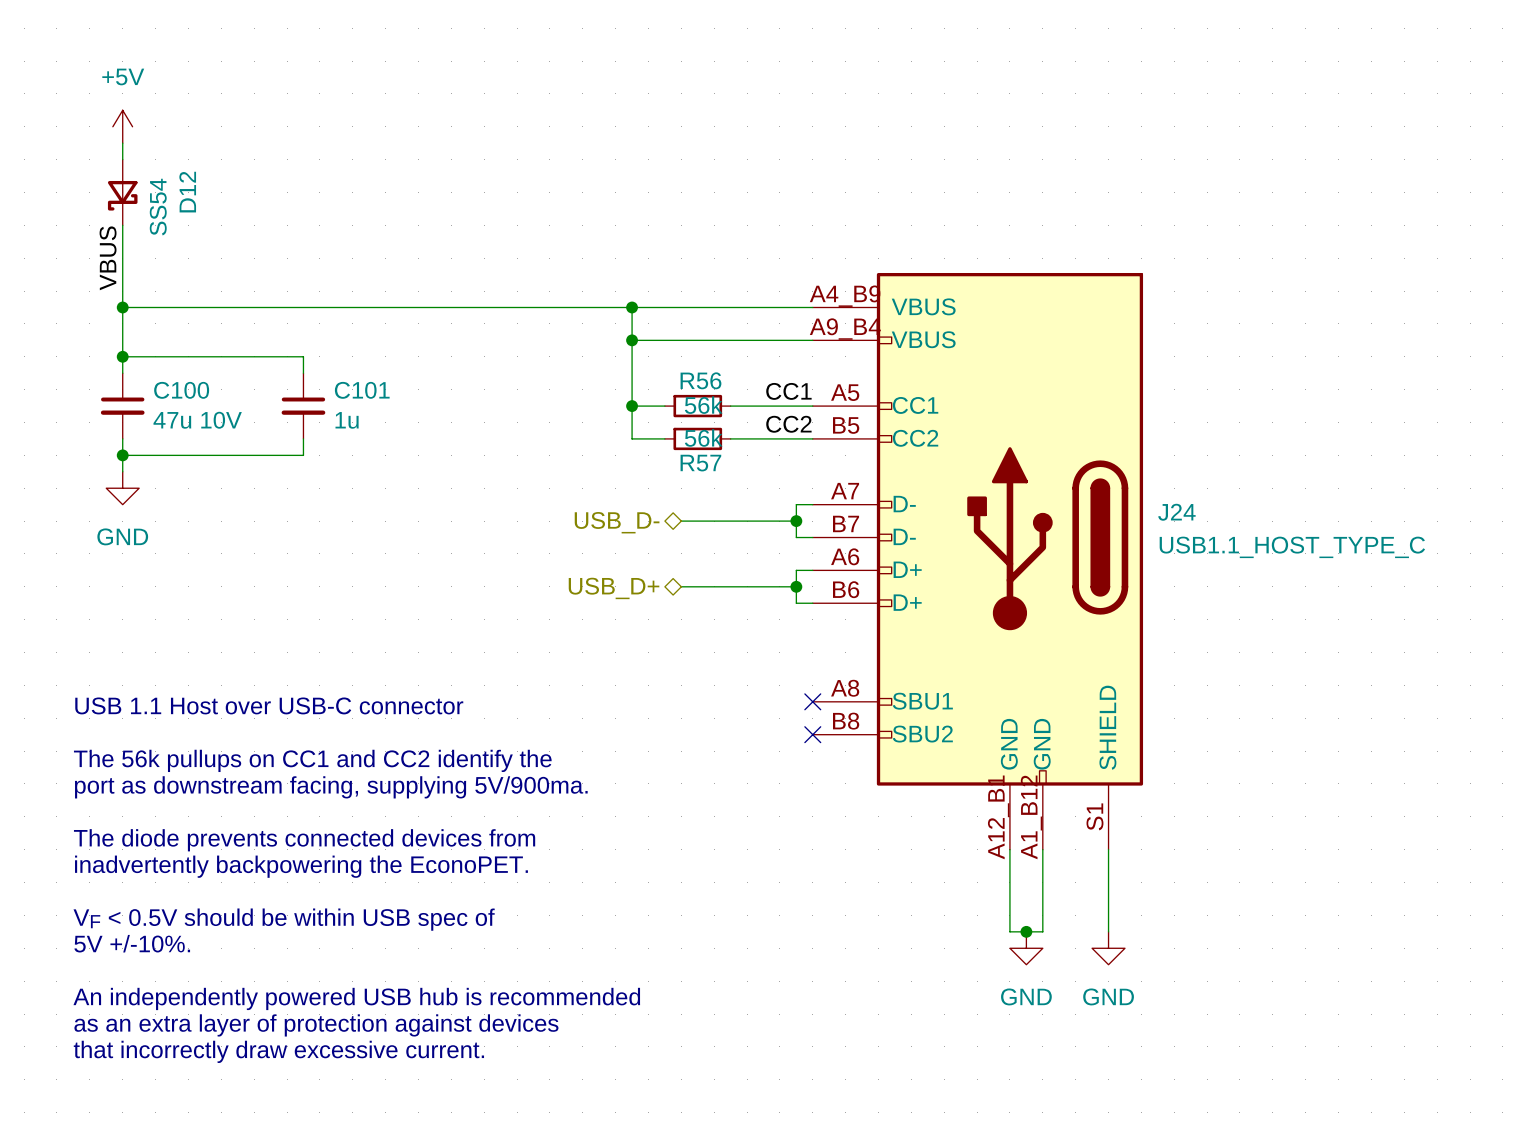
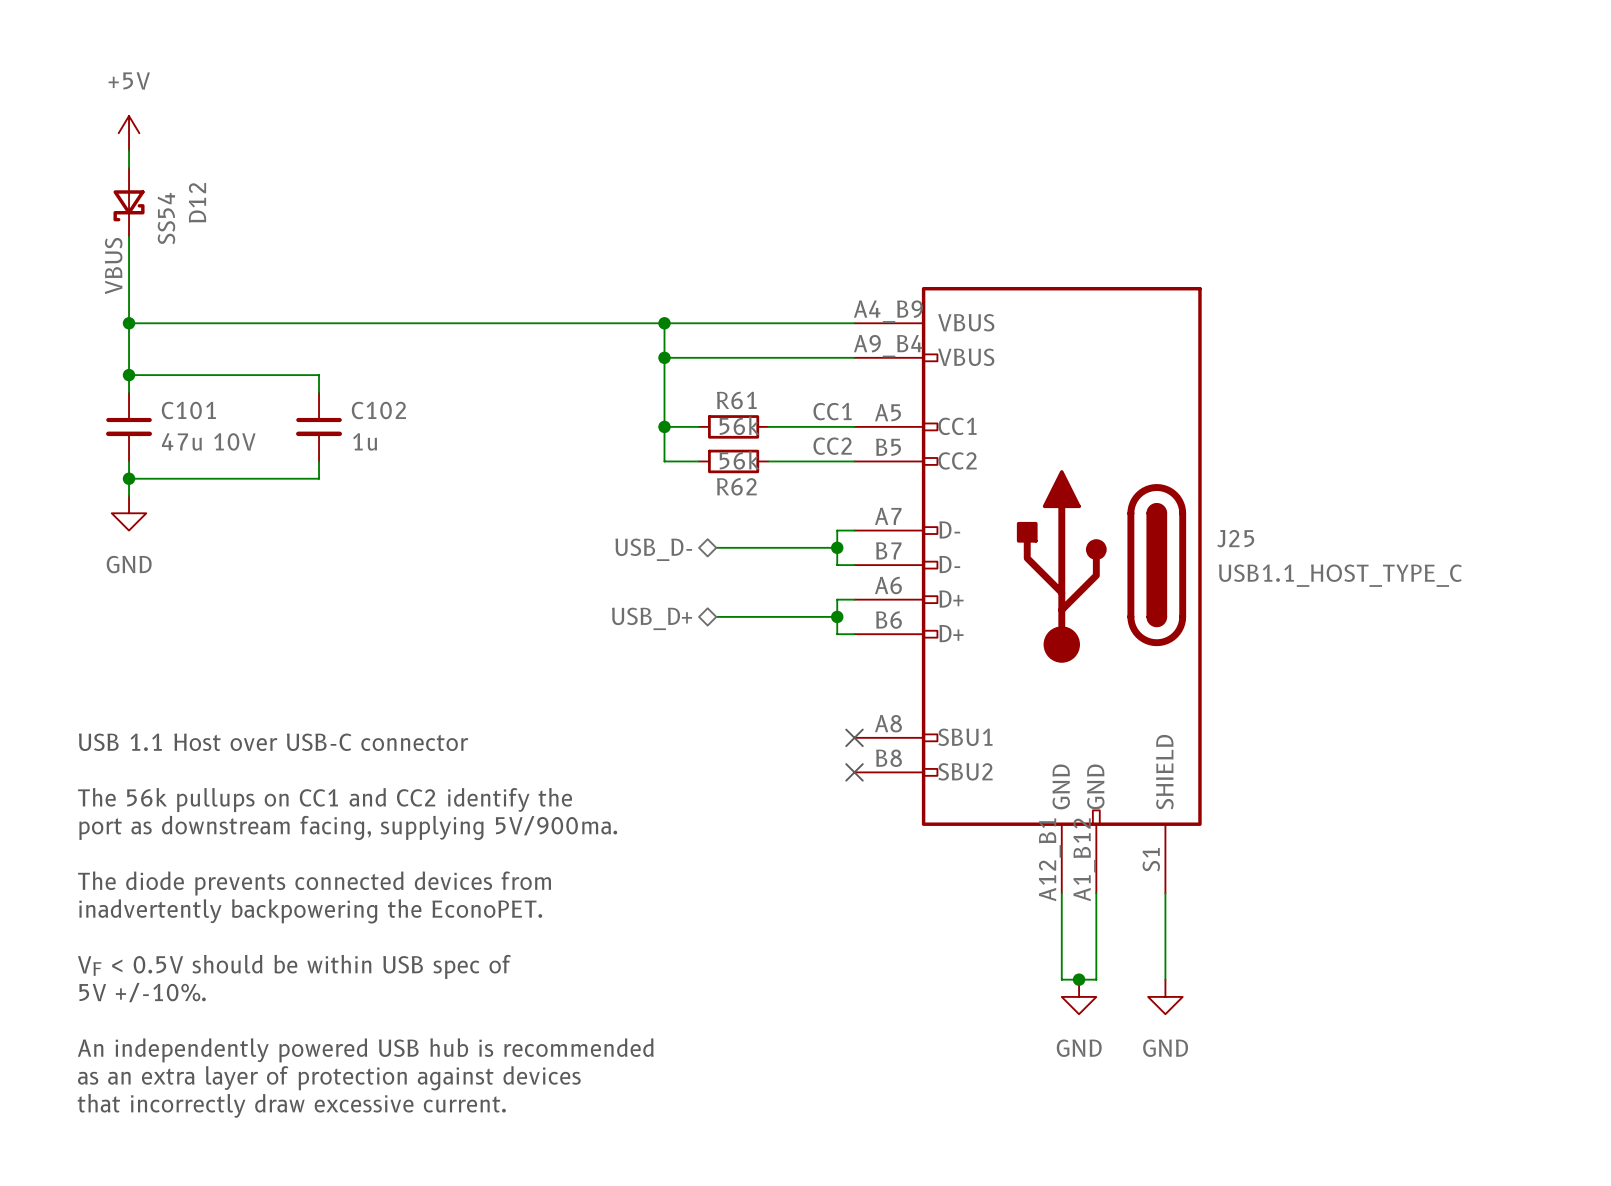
R56 name: R56 (700, 380) -> R61 (736, 400)
C100 name: C100 (181, 390) -> C101 (188, 410)
C101 name: C101 (362, 390) -> C102 (378, 410)
R57 name: R57 (700, 463) -> R62 (736, 486)
J24 name: J24 (1176, 512) -> J25 (1235, 538)

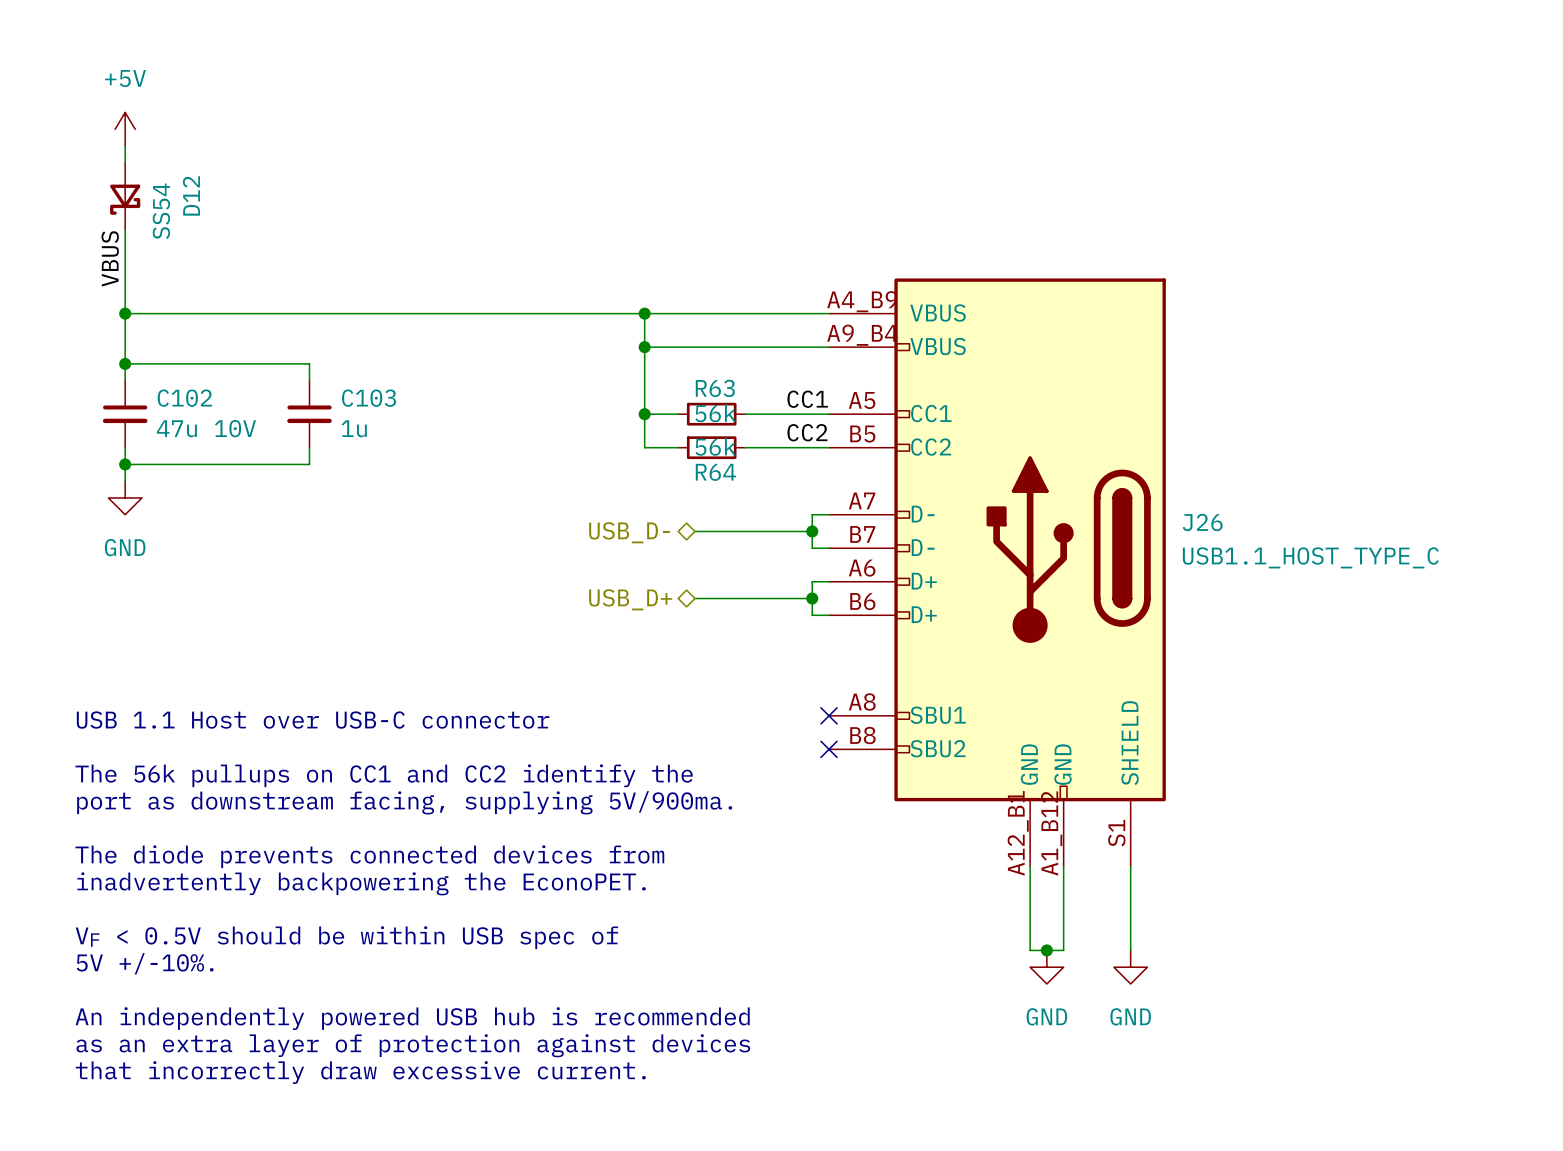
R61 name: R61 (736, 400) -> R63 (715, 388)
C101 name: C101 (188, 410) -> C102 (184, 398)
C102 name: C102 (378, 410) -> C103 (369, 398)
R62 name: R62 (736, 486) -> R64 (715, 472)
J25 name: J25 (1235, 538) -> J26 (1202, 522)

